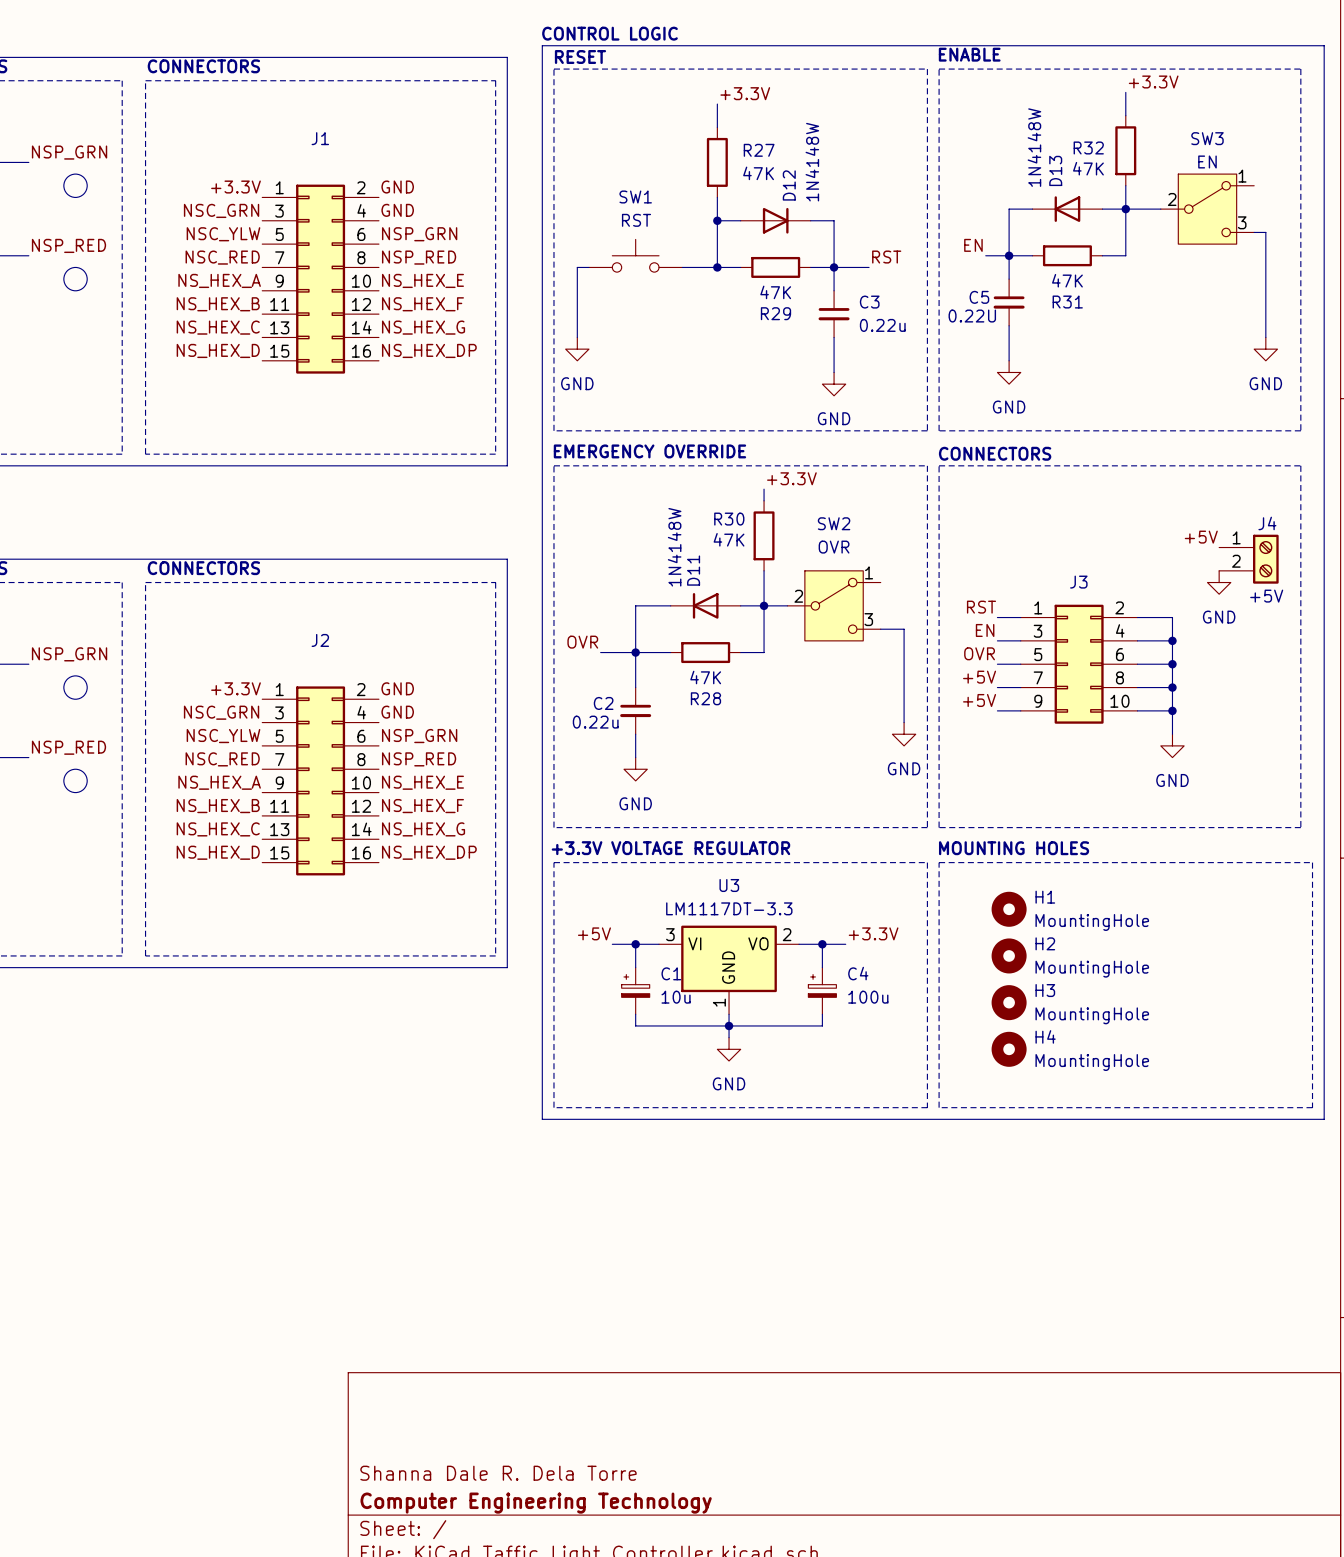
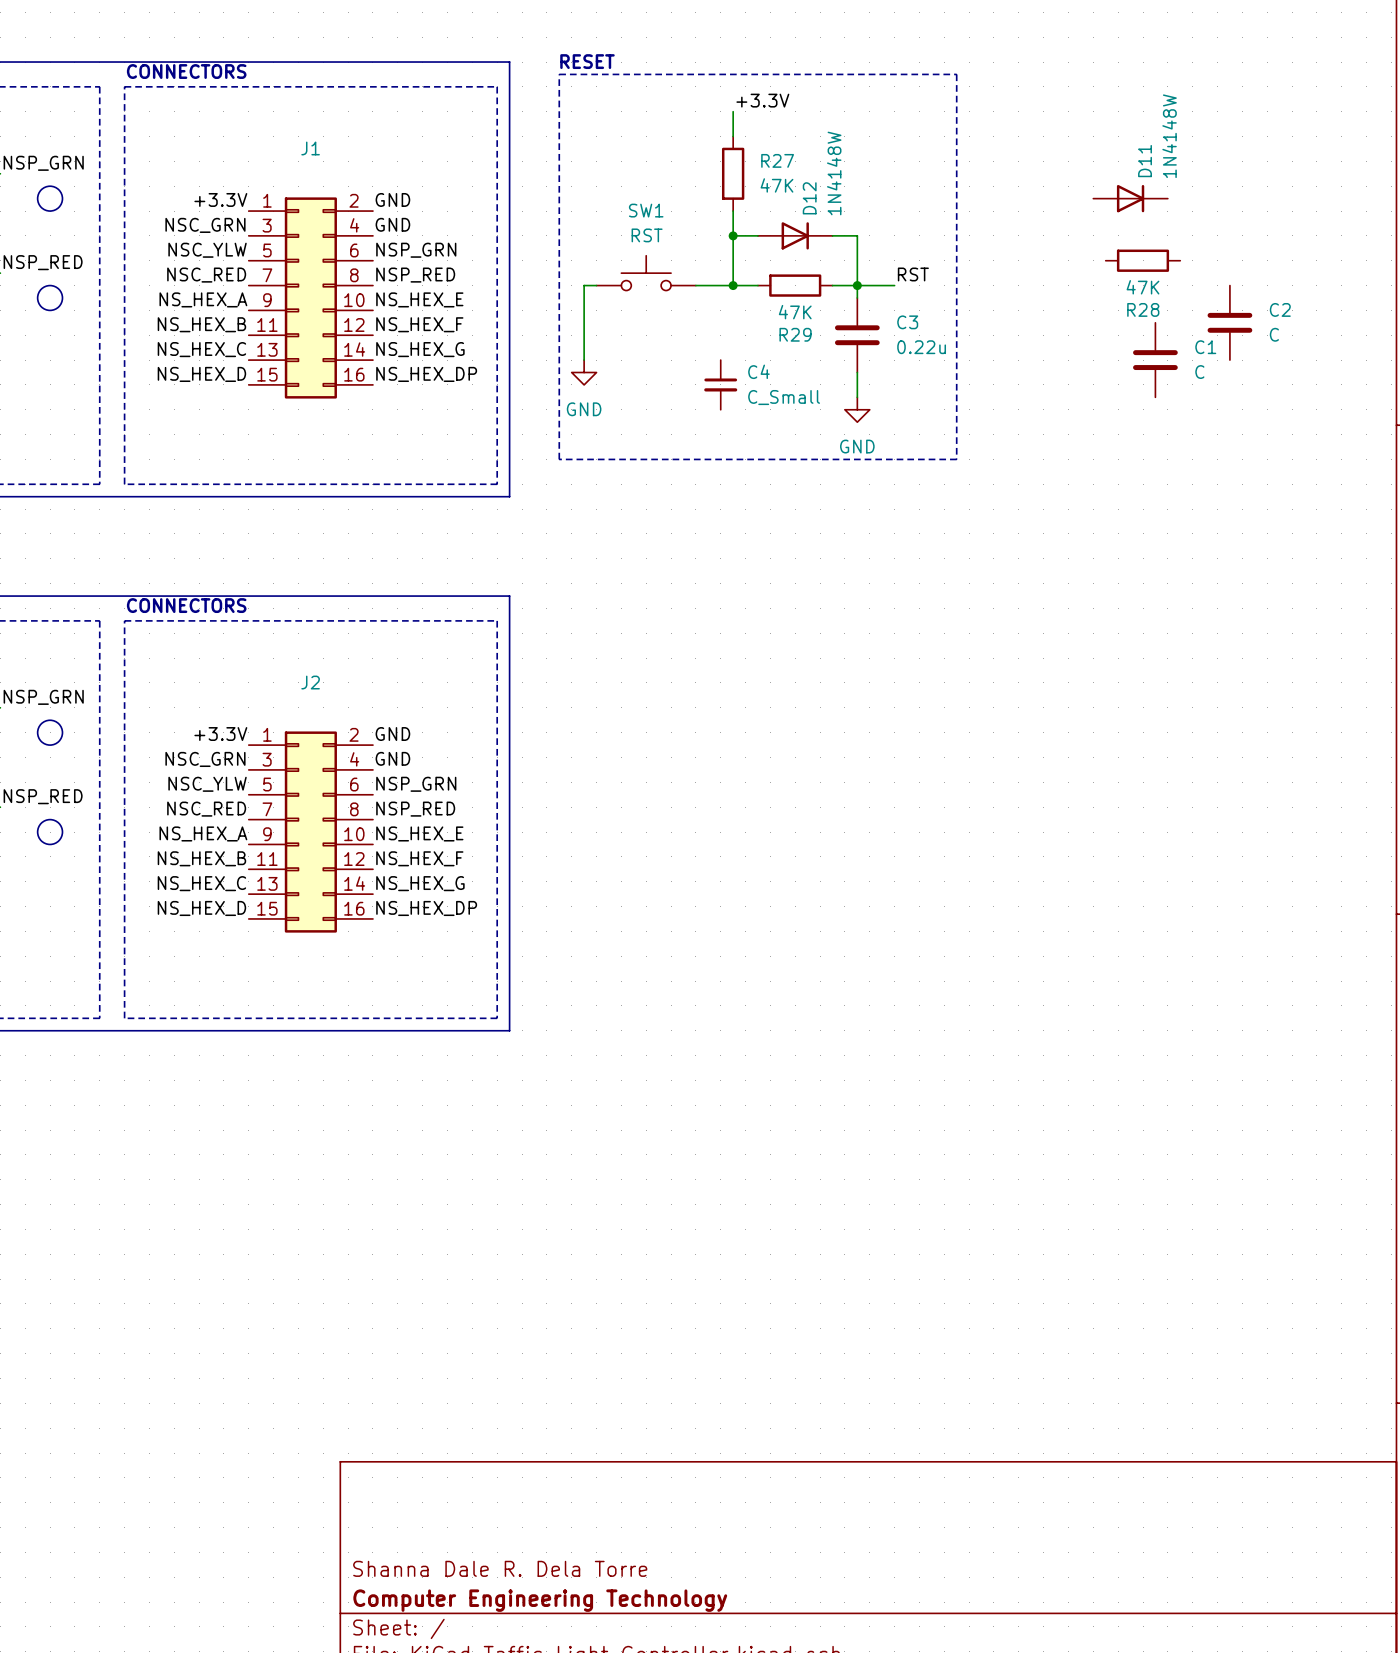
text: CONTROL LOGIC (610, 33) -> none
line: (542, 45) (1324, 45) (1324, 1119) (542, 1119) (542, 45) -> none
text: ENABLE (969, 54) -> none
line: (939, 69) (1300, 69) (1300, 430) (939, 430) (939, 69) -> none
label: +3.3V (1153, 81) -> none
wire: (1125, 92) (1125, 115) -> none
R32: 47K (1125, 150) -> none
wire: (1125, 185) (1125, 255) (1102, 255) -> none
wire: (1032, 209) (1009, 209) (1009, 279) -> none
D13: 1N4148W (1067, 209) -> none
wire: (1102, 209) (1160, 209) -> none
junction: (1125, 209) -> none
SW3: EN (1207, 209) -> none
wire: (1254, 232) (1265, 232) (1265, 337) -> none
label: EN (973, 245) -> none
wire: (985, 255) (1032, 255) -> none
junction: (1009, 255) -> none
R31: 47K (1067, 255) -> none
C3 symbol: [818, 290, 850, 338] -> [834, 297, 880, 373]
C5: 0.22U (1009, 302) -> none
wire: (1009, 325) (1009, 360) -> none
power symbol: GND (1265, 349) -> none
power symbol: GND (1009, 372) -> none
text: EMERGENCY OVERRIDE (649, 451) -> none
text: CONNECTORS (995, 453) -> none
line: (553, 465) (553, 827) (927, 827) (927, 465) (553, 465) -> none
line: (939, 465) (1300, 465) (1300, 827) (939, 827) (939, 465) -> none
label: +3.3V (791, 478) -> none
wire: (764, 489) (764, 500) -> none
R30: 47K (764, 535) -> none
label: +5V (1201, 537) -> none
D11 value position: 1N4148W (674, 547) -> 1N4148W (1169, 136)
J4: +5V (1248, 559) -> none
D11 name position: D11 (693, 570) -> D11 (1145, 161)
wire: (764, 570) (764, 652) (740, 652) -> none
power symbol: GND (1219, 582) -> none
wire: (670, 605) (635, 605) (635, 687) -> none
D11 rotation: 0° (705, 605) -> 180° (1130, 198)
D11 position: (705, 605) -> (1130, 198)
wire: (740, 605) (787, 605) -> none
junction: (764, 605) -> none
SW2: OVR (834, 605) -> none
label: RST (981, 607) -> none
wire: (997, 617) (1020, 617) -> none
wire: (1137, 617) (1172, 617) (1172, 734) -> none
wire: (880, 629) (904, 629) (904, 722) -> none
label: EN (985, 630) -> none
wire: (997, 640) (1020, 640) -> none
wire: (1137, 640) (1172, 640) -> none
junction: (1172, 640) -> none
label: OVR (582, 642) -> none
wire: (600, 652) (670, 652) -> none
junction: (635, 652) -> none
R28 position: (705, 652) -> (1143, 260)
label: OVR (979, 653) -> none
wire: (997, 664) (1020, 664) -> none
J3: (1079, 664) -> none
wire: (1137, 664) (1172, 664) -> none
junction: (1172, 664) -> none
label: +5V (979, 677) -> none
C2 symbol: [620, 687, 652, 735] -> [1207, 285, 1253, 361]
wire: (997, 687) (1020, 687) -> none
wire: (1137, 687) (1172, 687) -> none
junction: (1172, 687) -> none
label: +5V (979, 700) -> none
C2 name position: C2 (603, 703) -> C2 (1280, 309)
wire: (997, 710) (1020, 710) -> none
wire: (1137, 710) (1172, 710) -> none
junction: (1172, 710) -> none
C2 value: 0.22u (595, 722) -> C (1274, 334)
wire: (635, 734) (635, 757) -> none
power symbol: GND (904, 734) -> none
power symbol: GND (1172, 745) -> none
power symbol: GND (635, 769) -> none
text: +3.3V VOLTAGE REGULATOR (670, 848) -> none
text: MOUNTING HOLES (1014, 848) -> none
line: (553, 862) (553, 1107) (927, 1107) (927, 862) (553, 862) -> none
line: (939, 862) (939, 1107) (1312, 1107) (1312, 862) (939, 862) -> none
H1: MountingHole (1009, 909) -> none
label: +5V (594, 933) -> none
label: +3.3V (873, 933) -> none
wire: (612, 944) (659, 944) -> none
wire: (635, 944) (635, 967) -> none
junction: (635, 944) -> none
wire: (799, 944) (845, 944) -> none
wire: (822, 944) (822, 967) -> none
junction: (822, 944) -> none
H2: MountingHole (1009, 955) -> none
C1 symbol: [621, 967, 650, 1015] -> [1133, 322, 1178, 398]
C4 symbol: [808, 967, 837, 1015] -> [704, 360, 738, 410]
U3: LM1117DT-3.3 (729, 969) -> none
C1 value: 10u (676, 997) -> C (1199, 372)
C4 value: 100u (868, 997) -> C_Small (784, 397)
H3: MountingHole (1009, 1002) -> none
wire: (635, 1014) (635, 1025) (822, 1025) (822, 1014) -> none
wire: (729, 1014) (729, 1037) -> none
junction: (729, 1025) -> none
power symbol: GND (729, 1049) -> none
H4: MountingHole (1009, 1049) -> none

